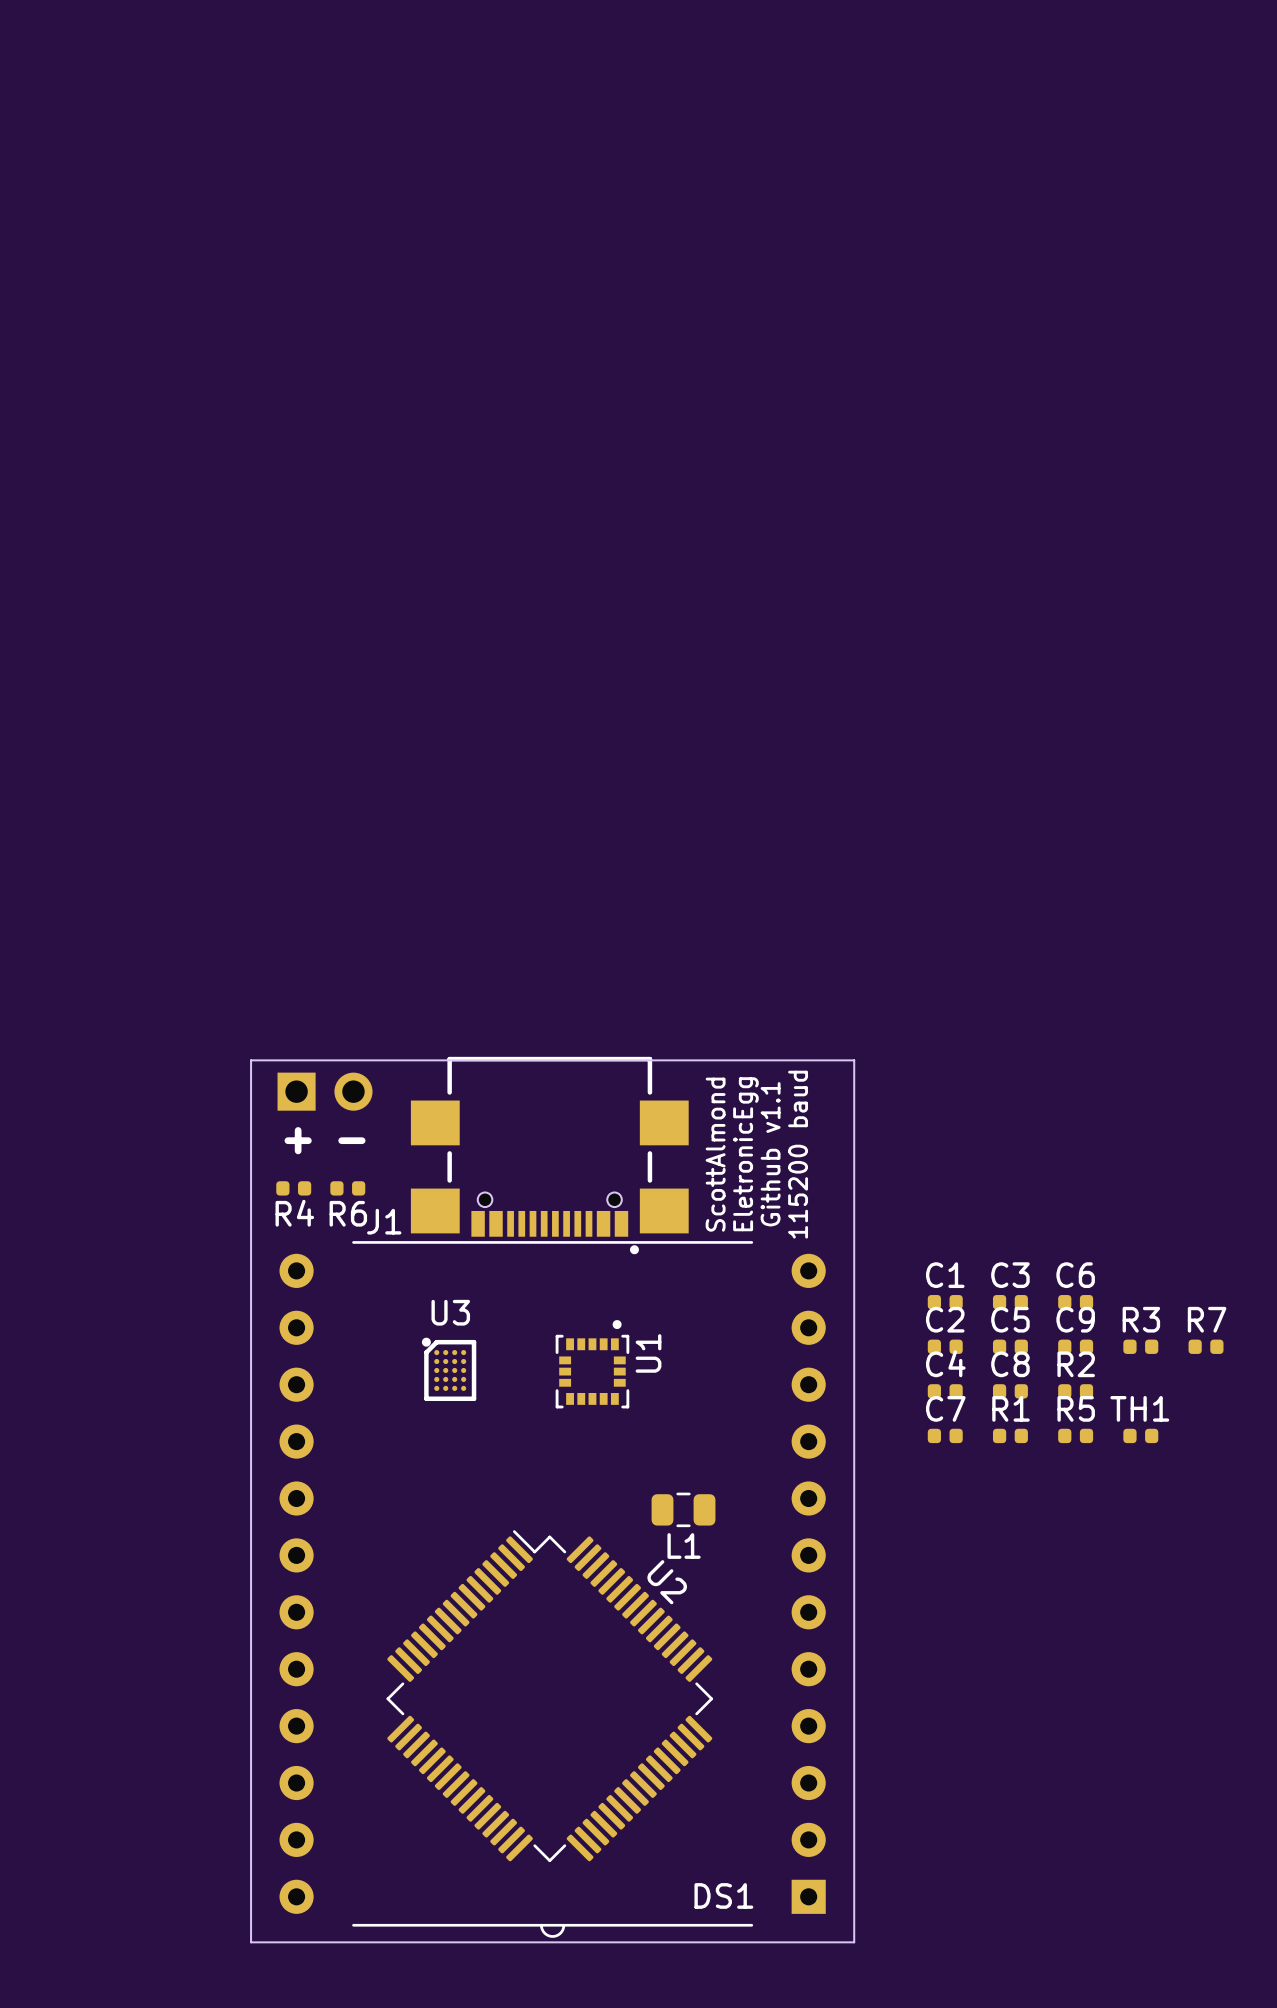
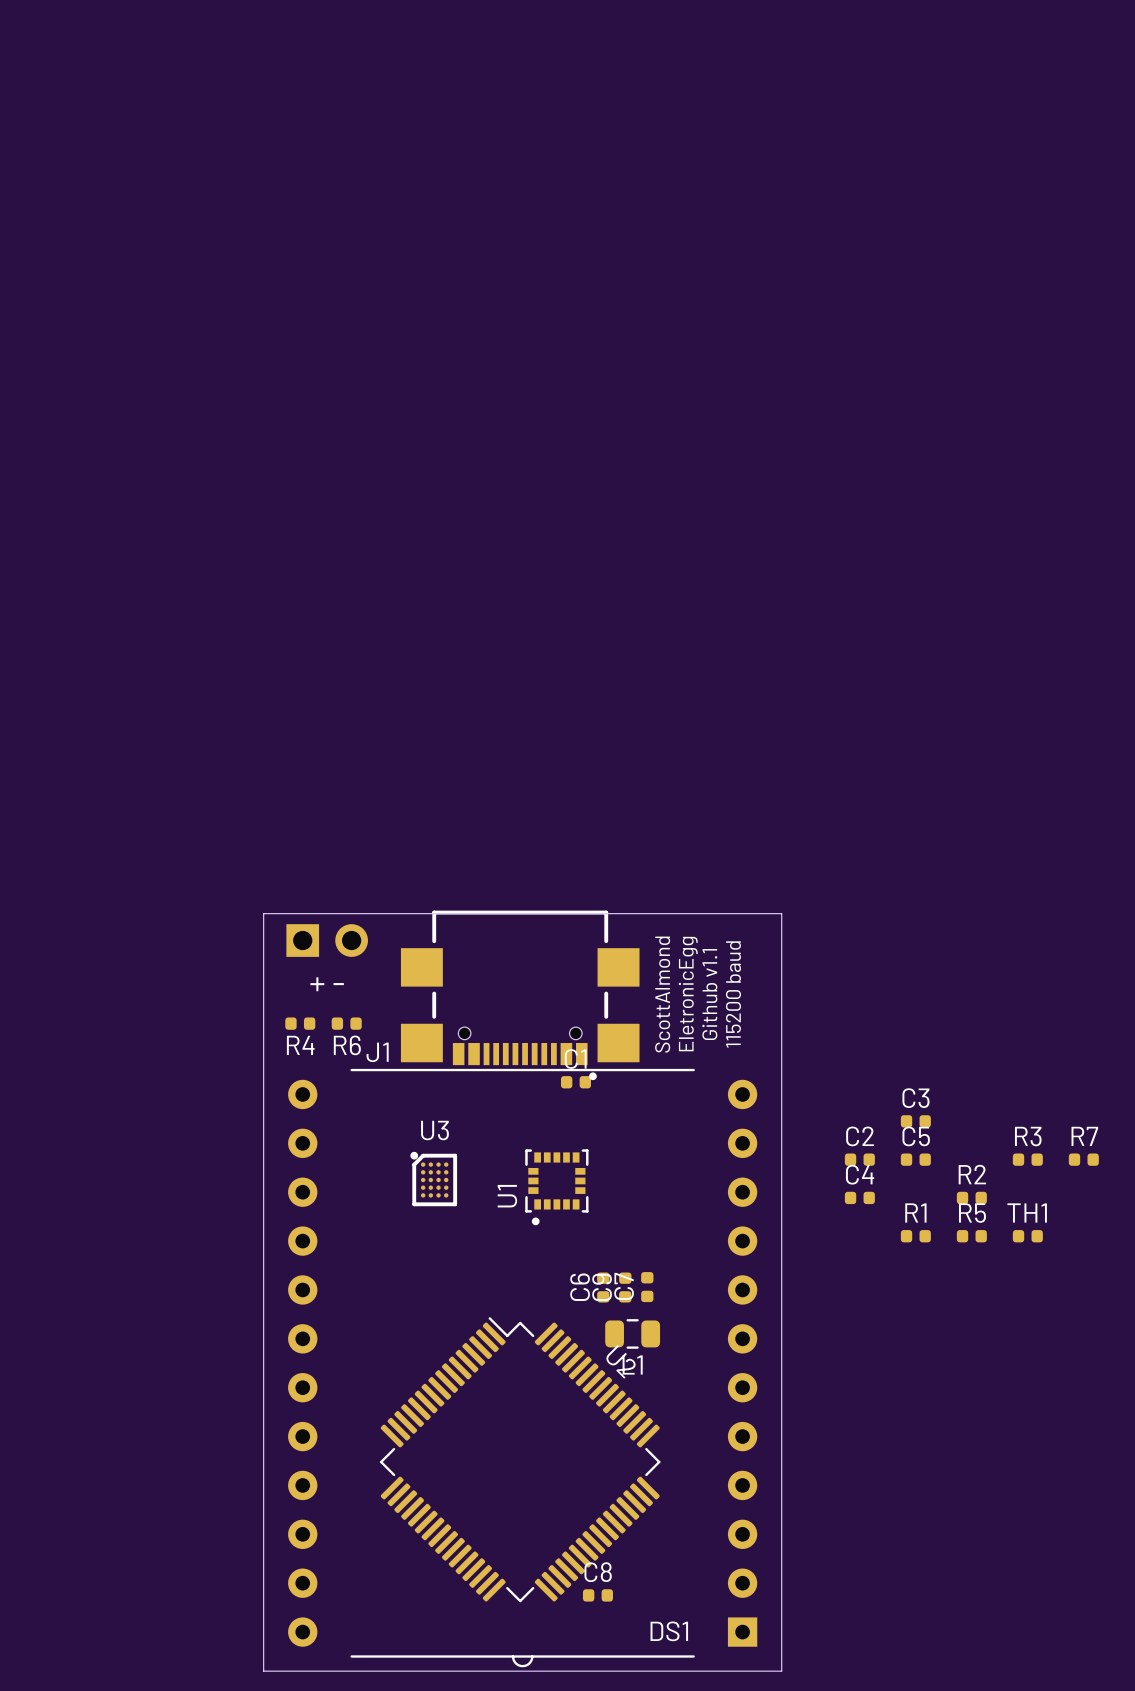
C1 position: (945, 1302) -> (575, 1082)
C6 rotation: 0° (1075, 1302) -> 90° clockwise (603, 1287)
C6 position: (1075, 1302) -> (603, 1287)
C9 rotation: 0° (1075, 1346) -> 90° clockwise (625, 1287)
C9 position: (1075, 1346) -> (625, 1287)
U1 rotation: 0° (592, 1364) -> 180° (556, 1187)
C8 position: (1010, 1391) -> (597, 1595)
C7 rotation: 0° (945, 1435) -> 90° clockwise (647, 1287)
C7 position: (945, 1435) -> (647, 1287)
L1 position: (683, 1509) -> (632, 1333)

